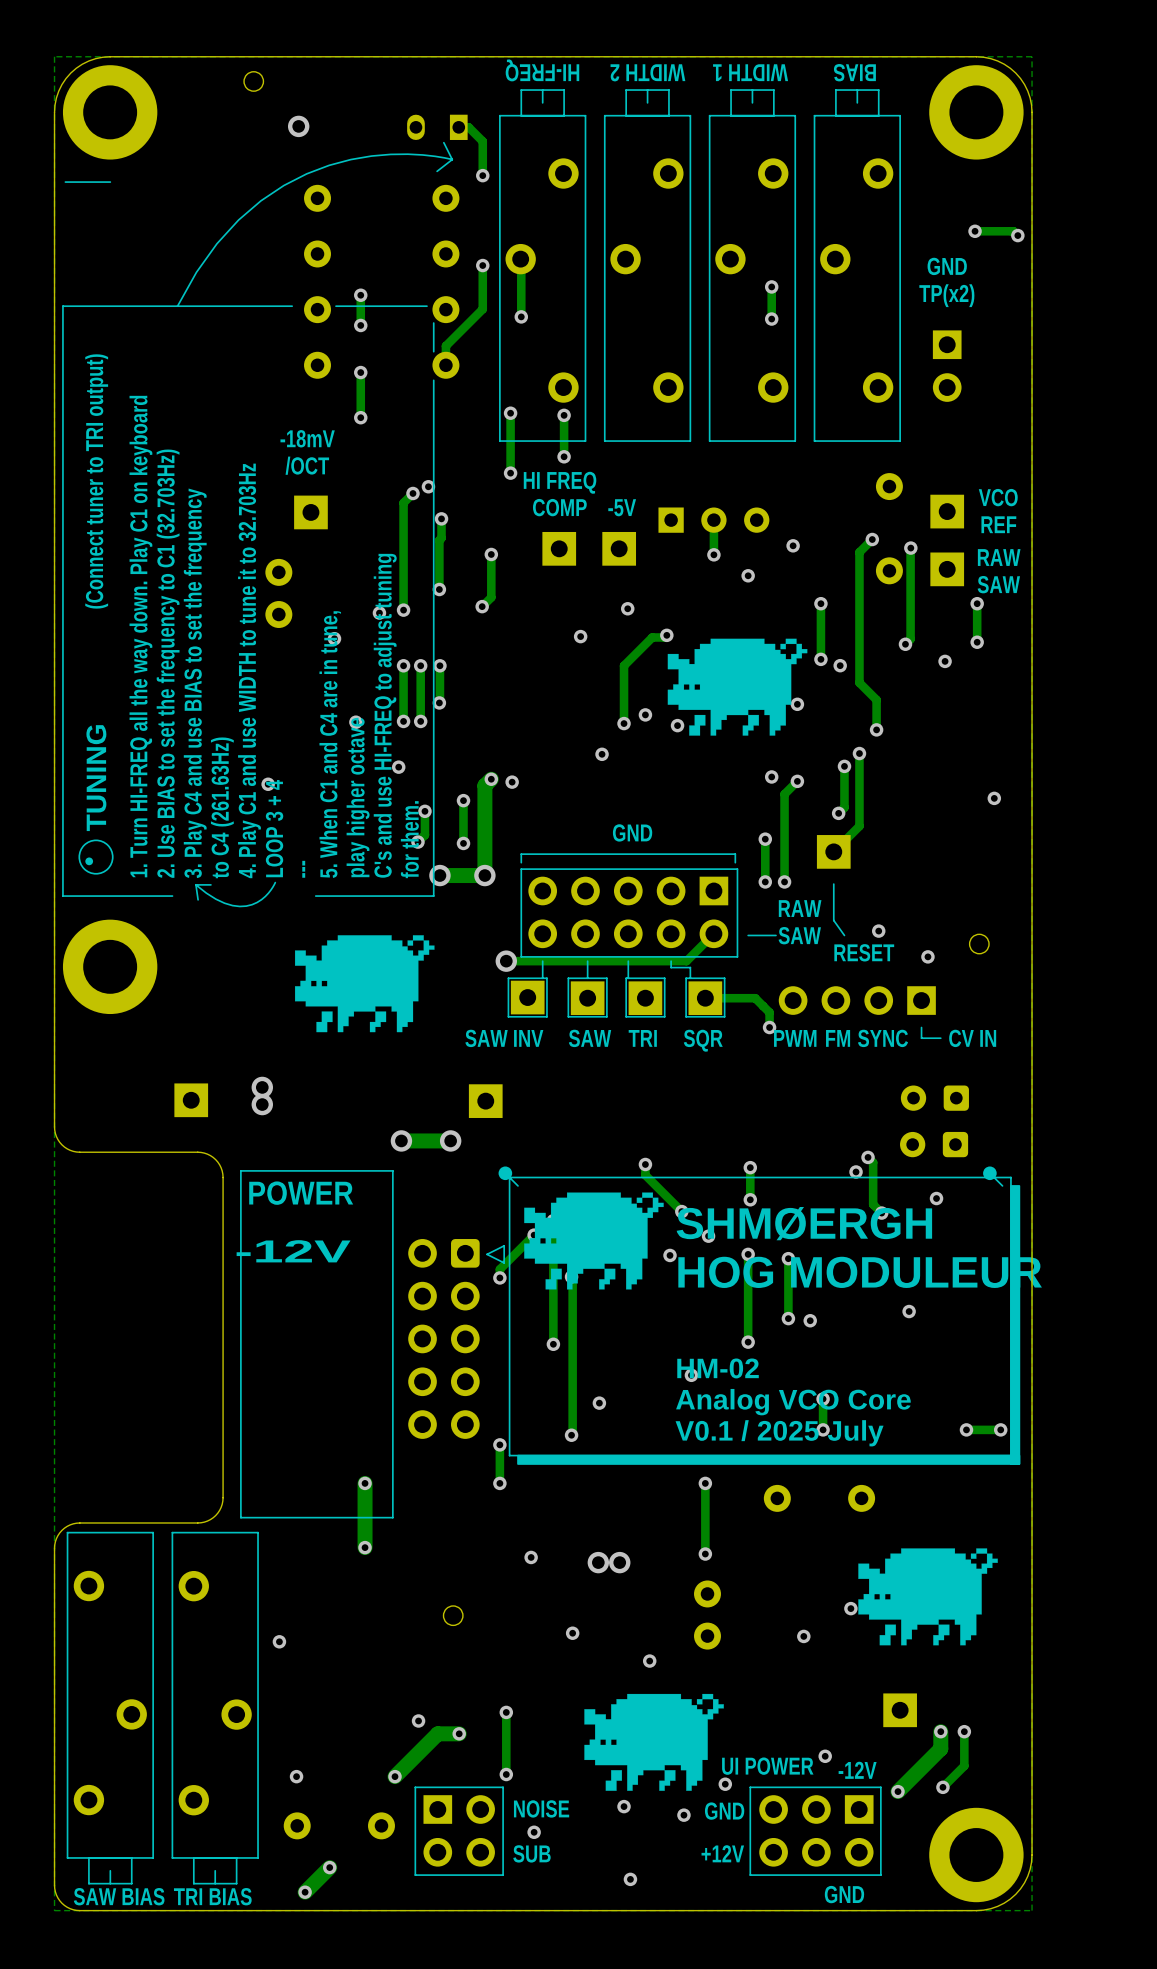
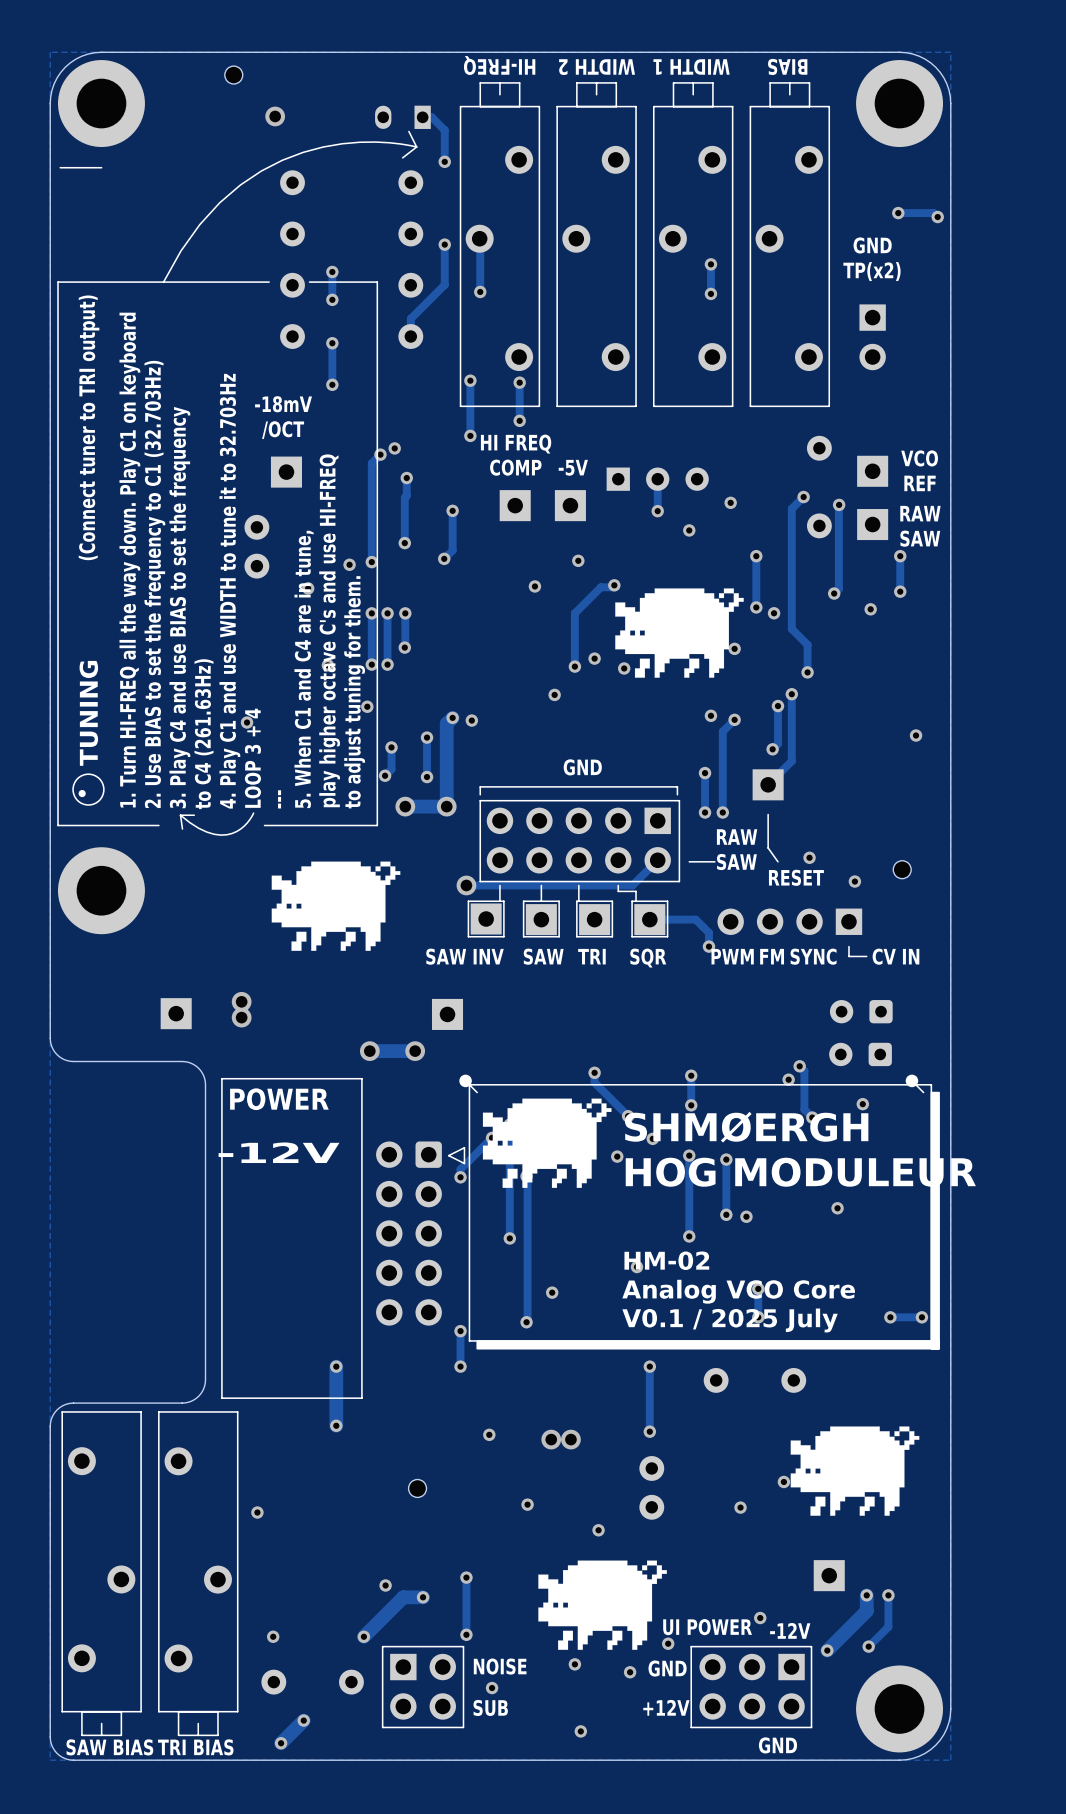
line: (426, 306) (409, 306) -> none
line: (433, 323) (433, 351) -> none
line: (433, 380) (433, 896) (409, 896) -> (377, 282) (377, 825)
text: C's and use HI-FREQ to adjust tuning (385, 715) -> to adjust tuning for them. (354, 692)
text: play higher octave (358, 797) -> play higher octave C's and use HI-FREQ (329, 630)
text: for them. (409, 839) -> none
line: none -> (290, 825) (264, 825)

